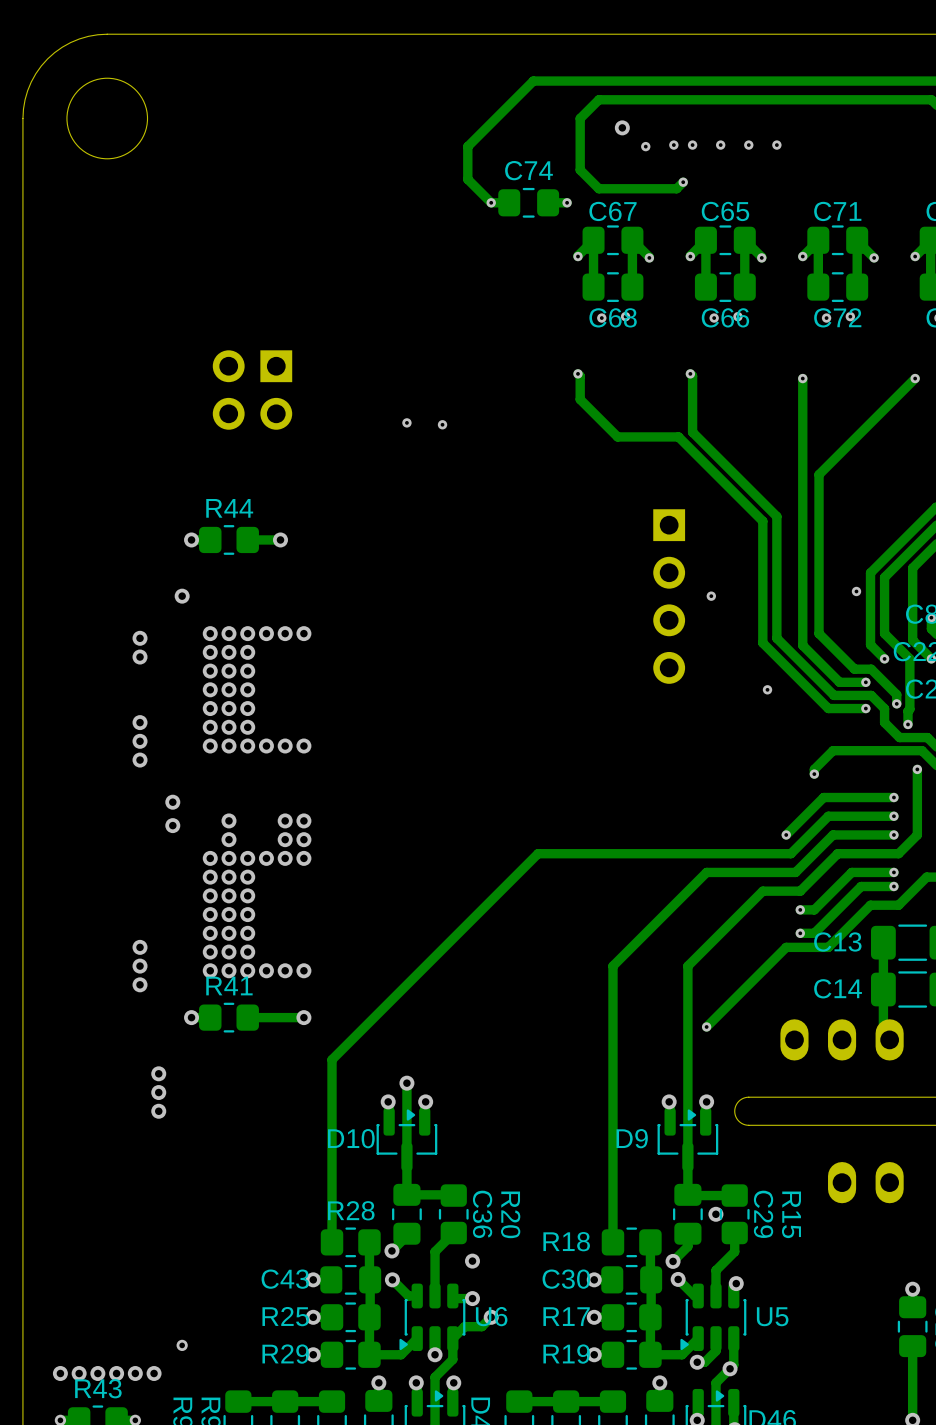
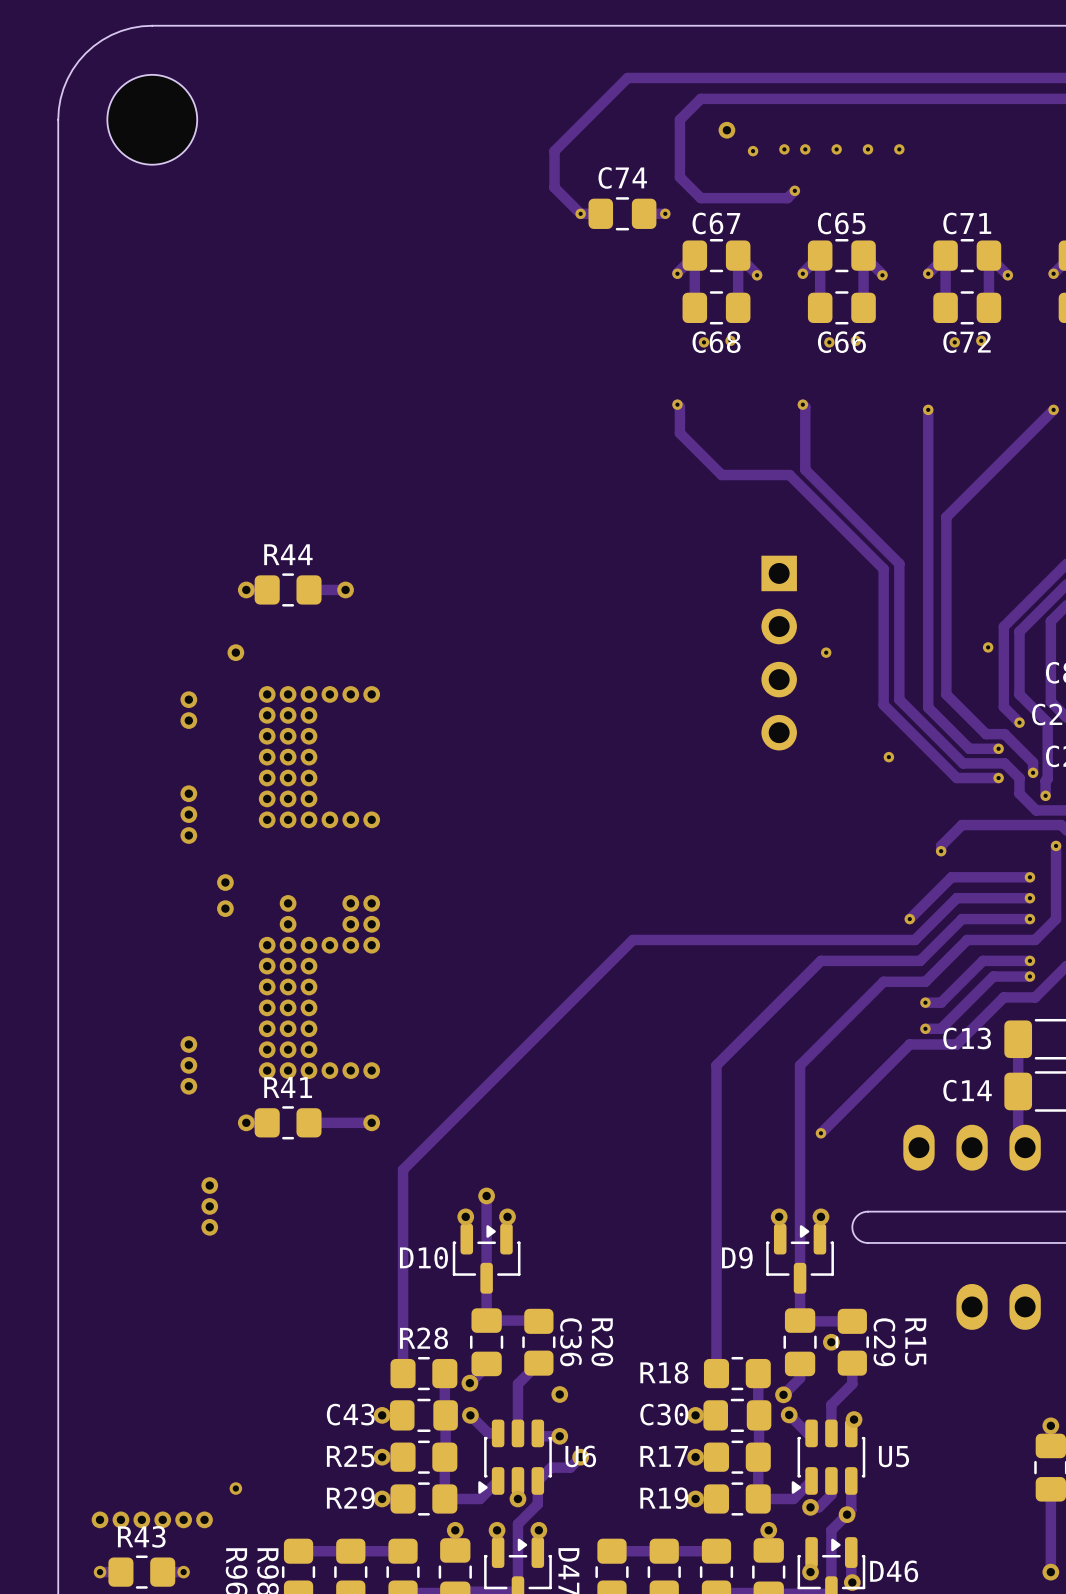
part: (252, 390) -> none
via: (406, 422) -> none
via: (442, 424) -> none

